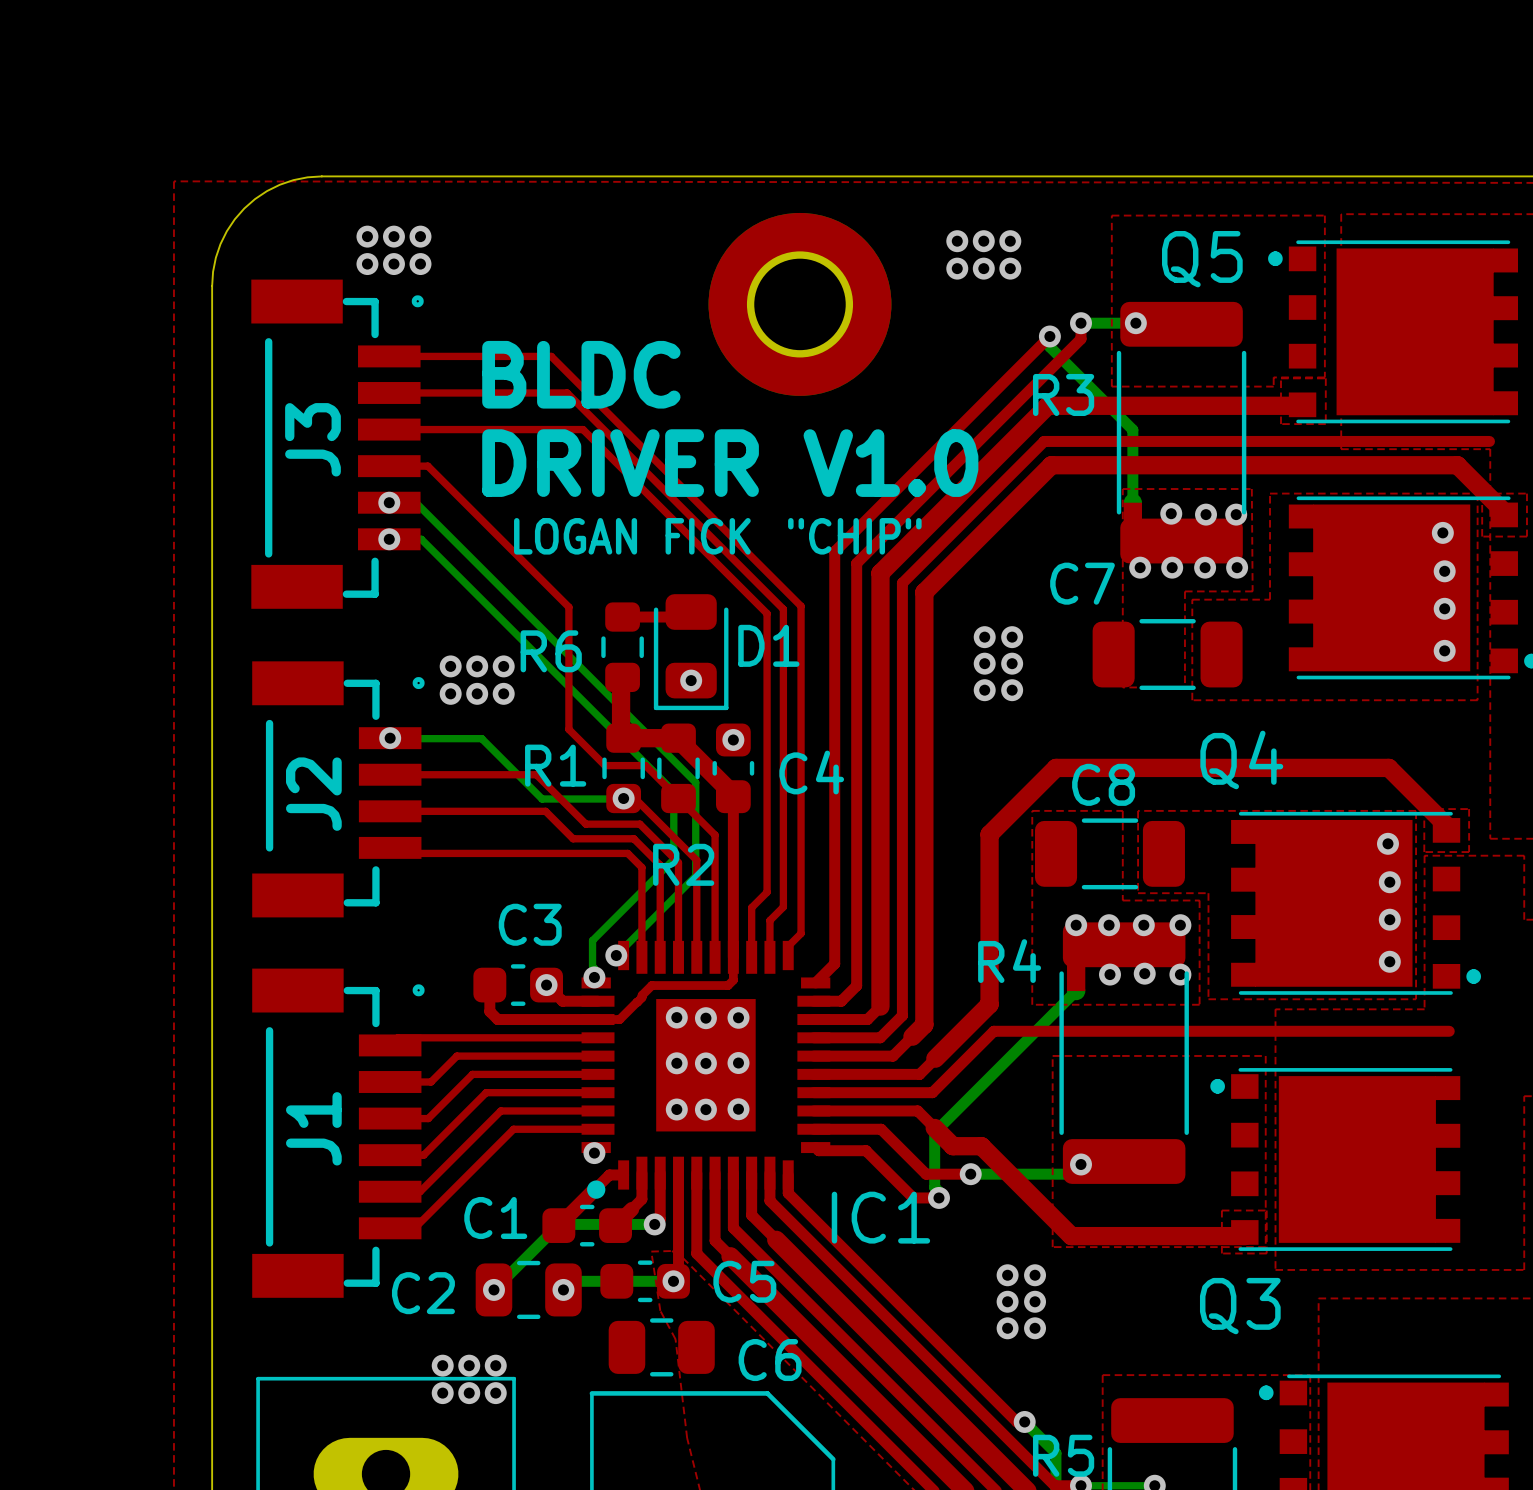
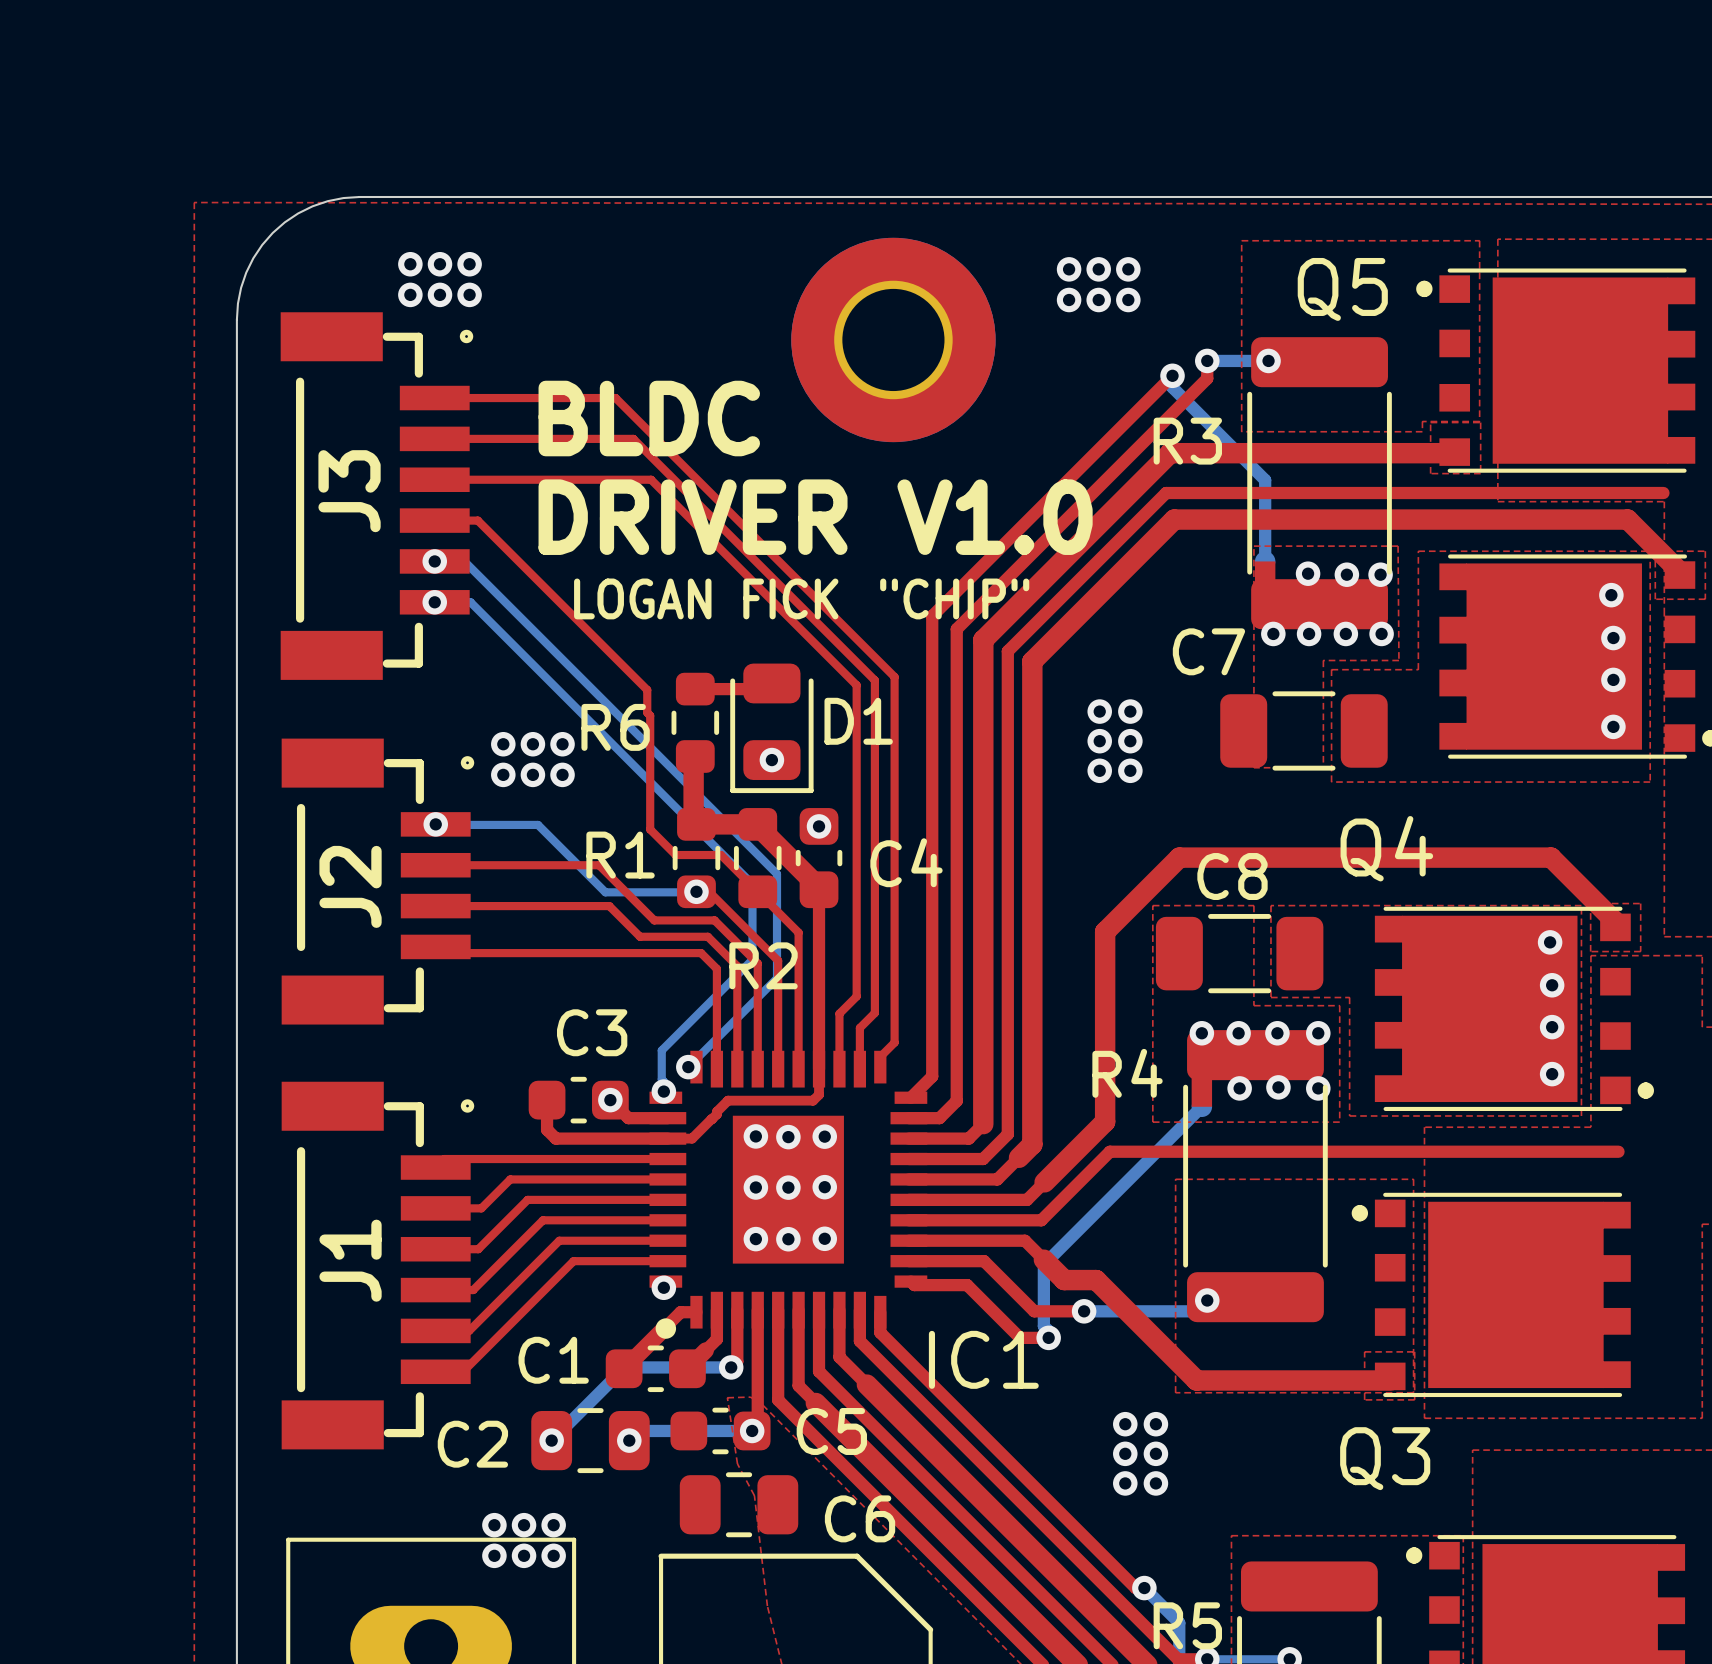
top track: (568, 607) (568, 729) (582, 742) -> (635, 678) (647, 690) (647, 712) (650, 715) (650, 829)

